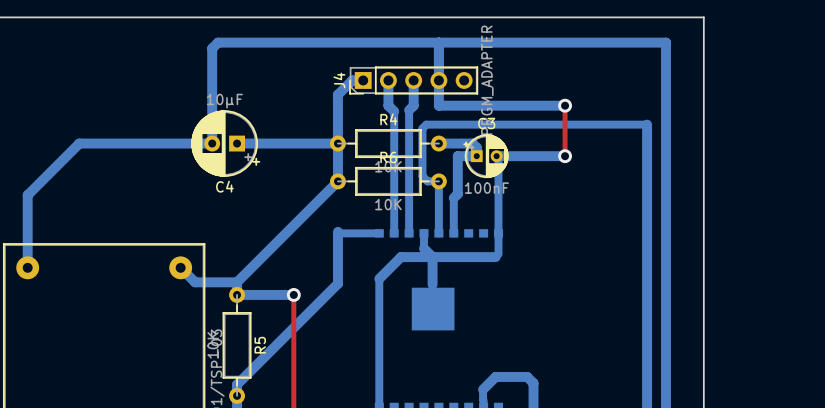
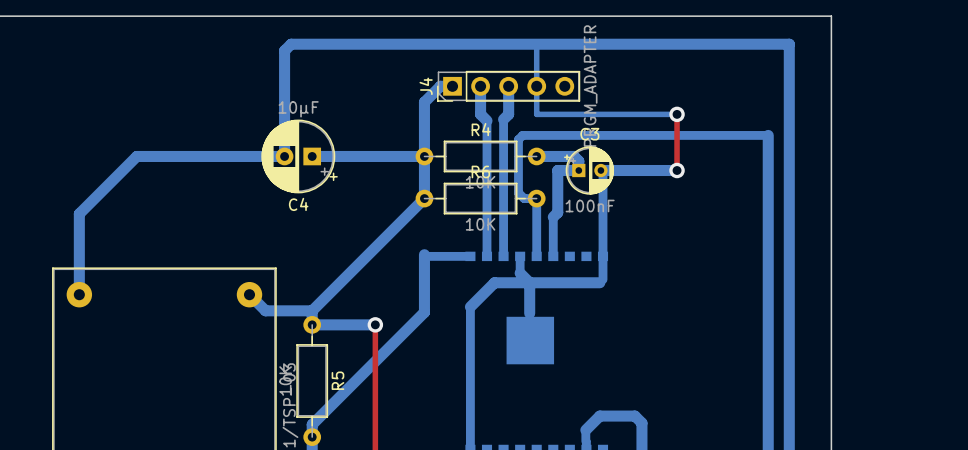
bottom track width: thick (438, 42) (438, 105) (565, 105) -> thin (536, 44) (536, 114) (677, 114)

